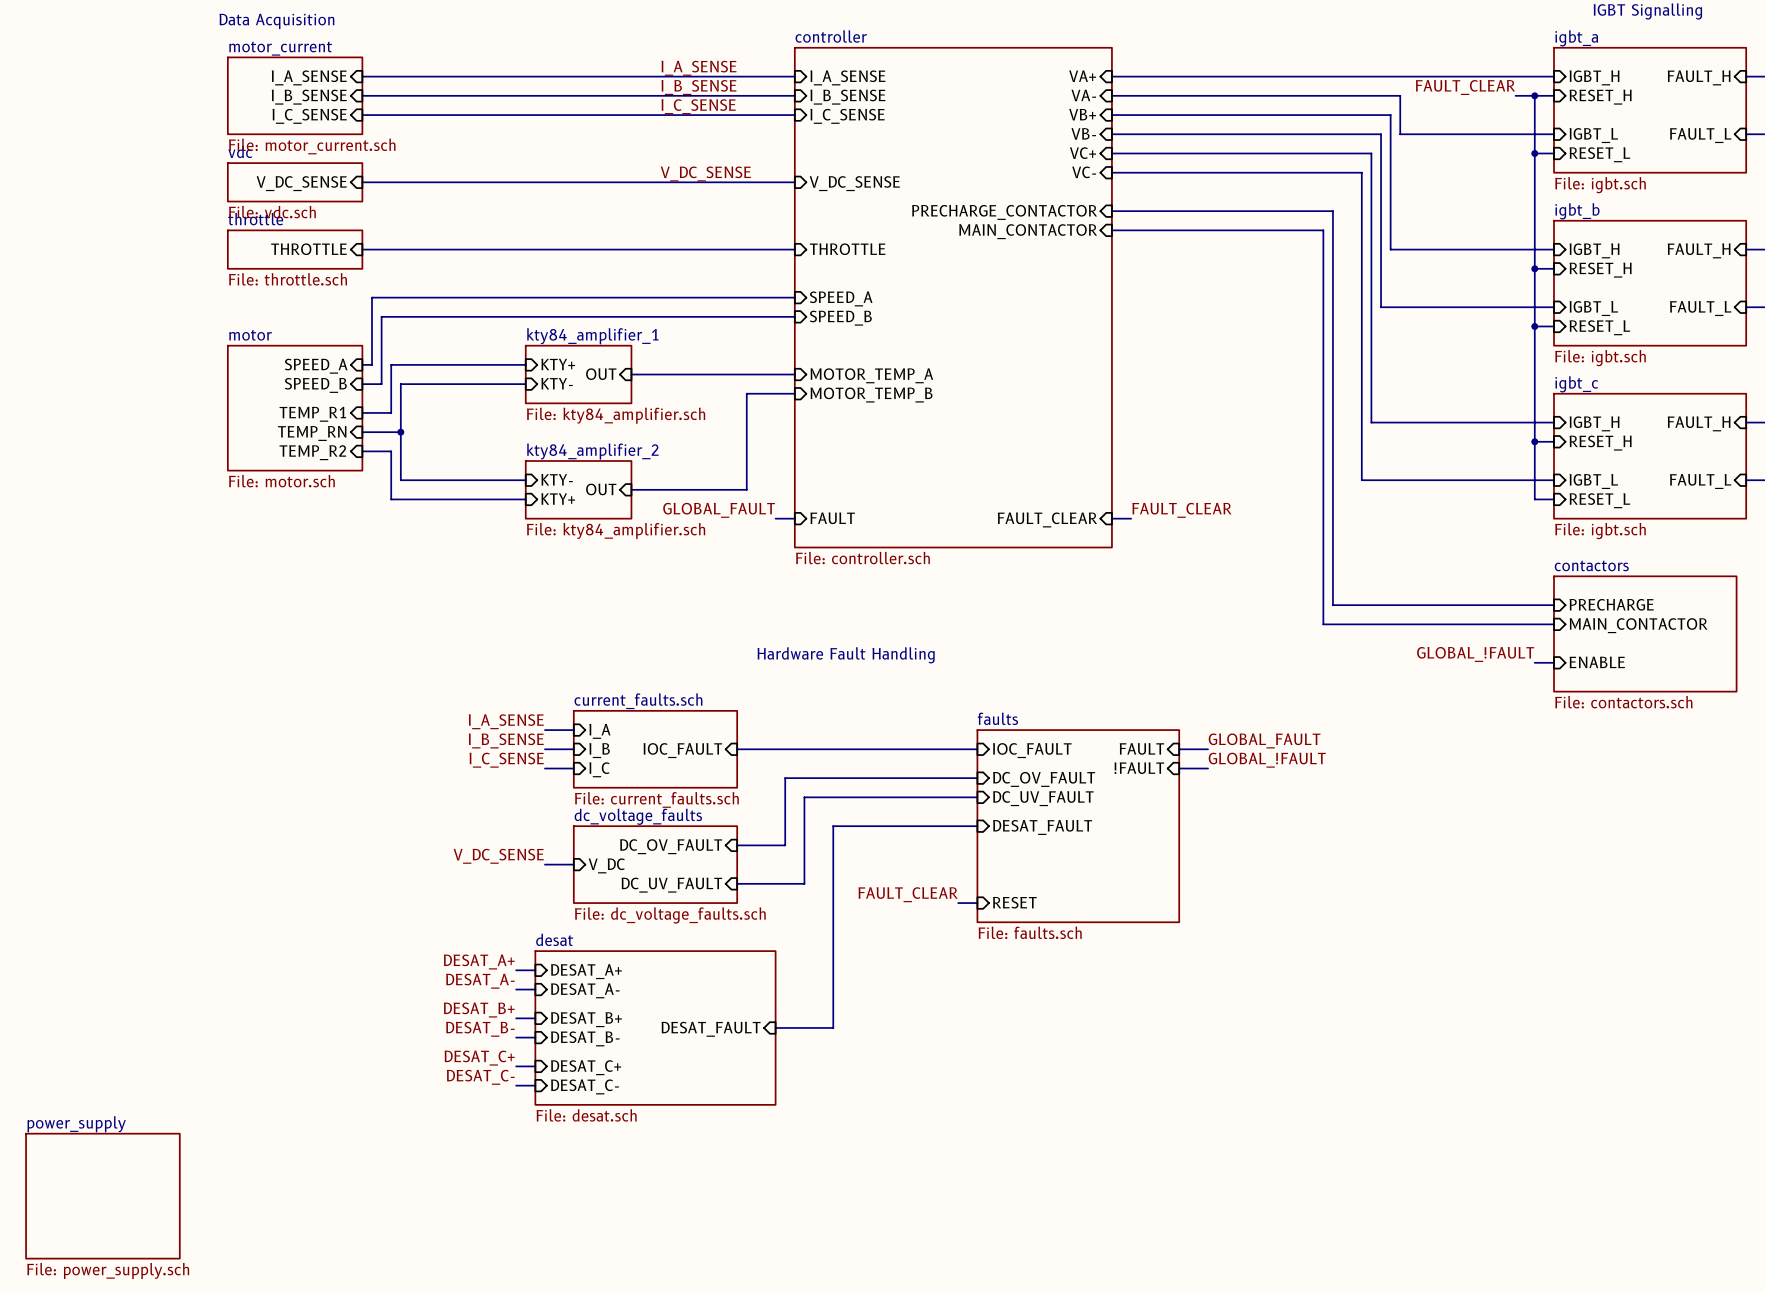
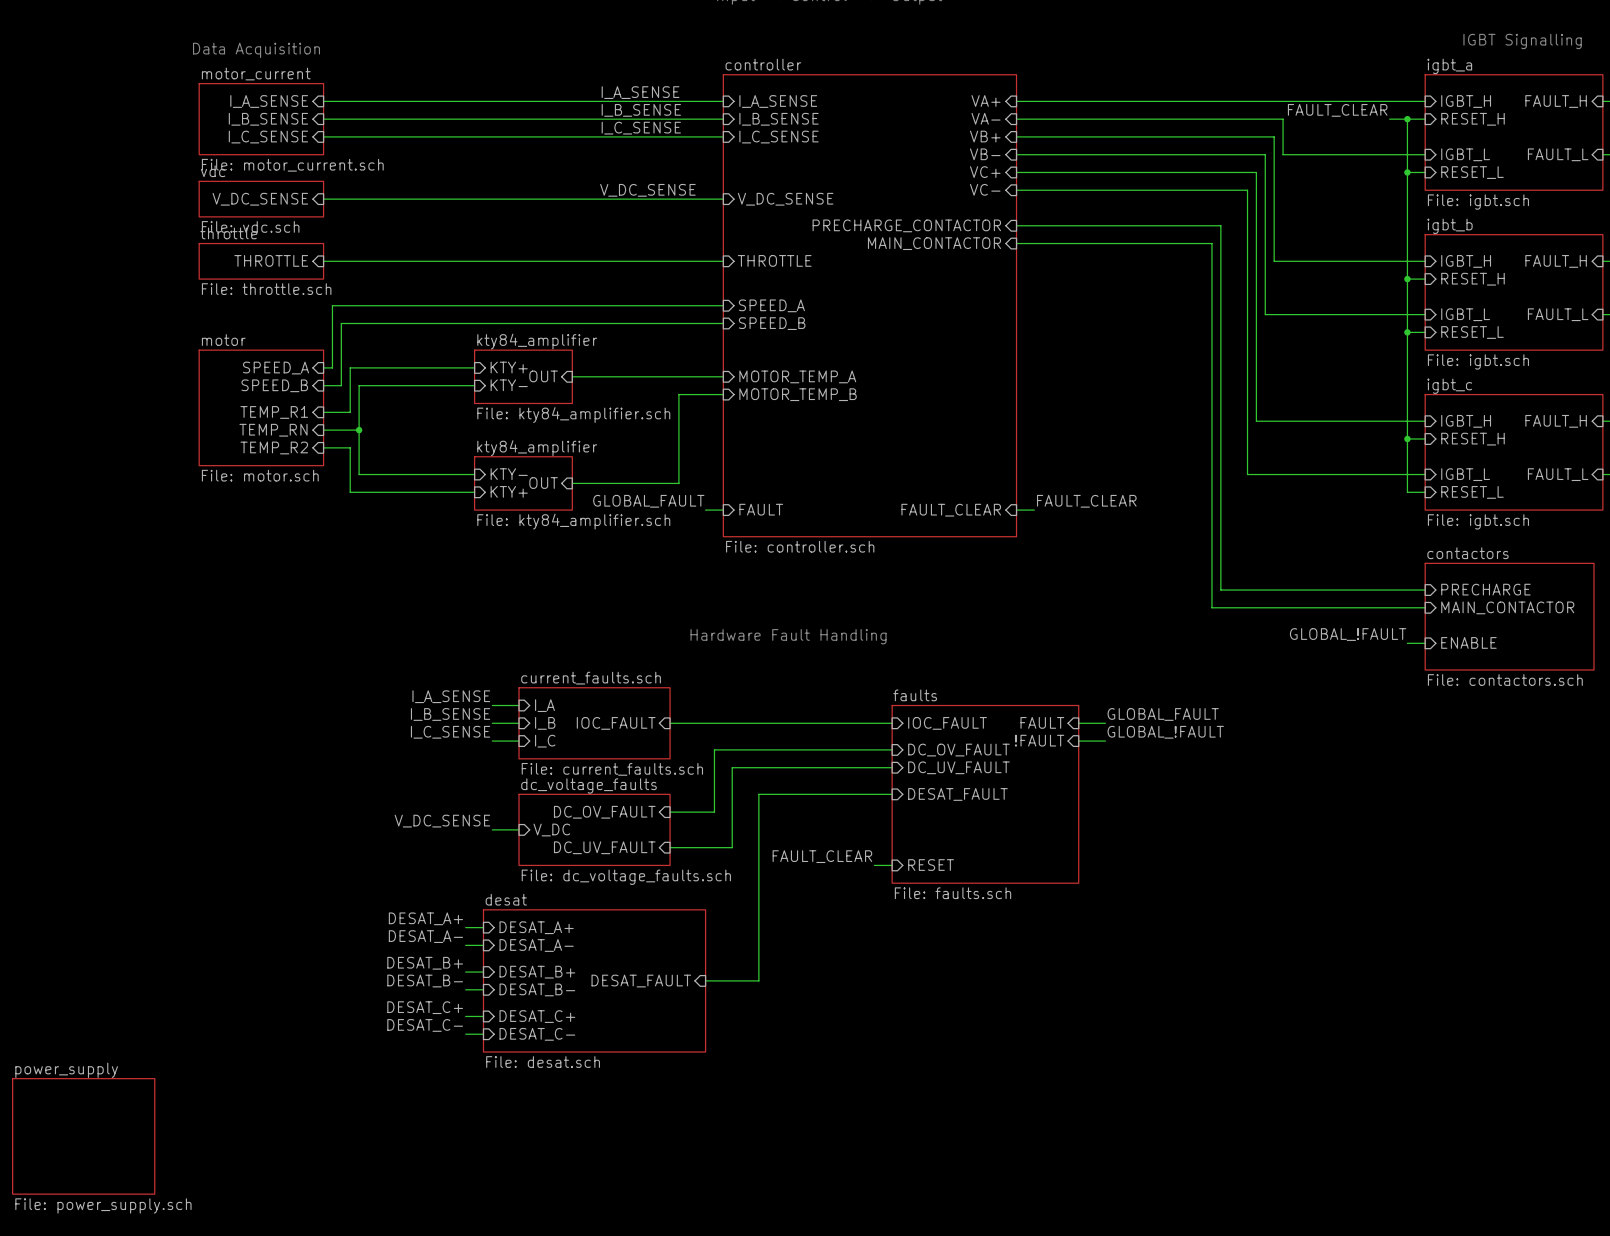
sheet kty84_amplifier_1 name: kty84_amplifier_1 (592, 336) -> kty84_amplifier (537, 341)
sheet kty84_amplifier_2 name: kty84_amplifier_2 (592, 451) -> kty84_amplifier (537, 448)

